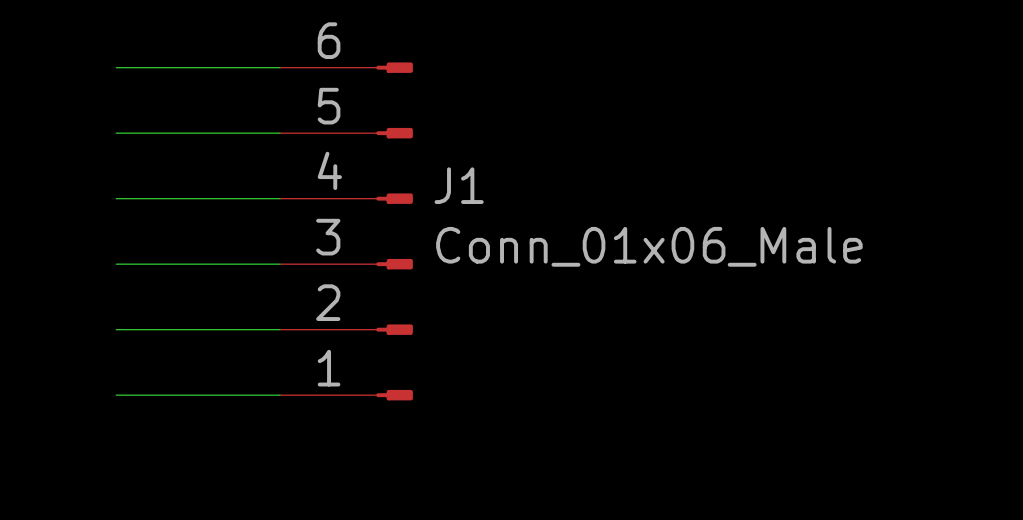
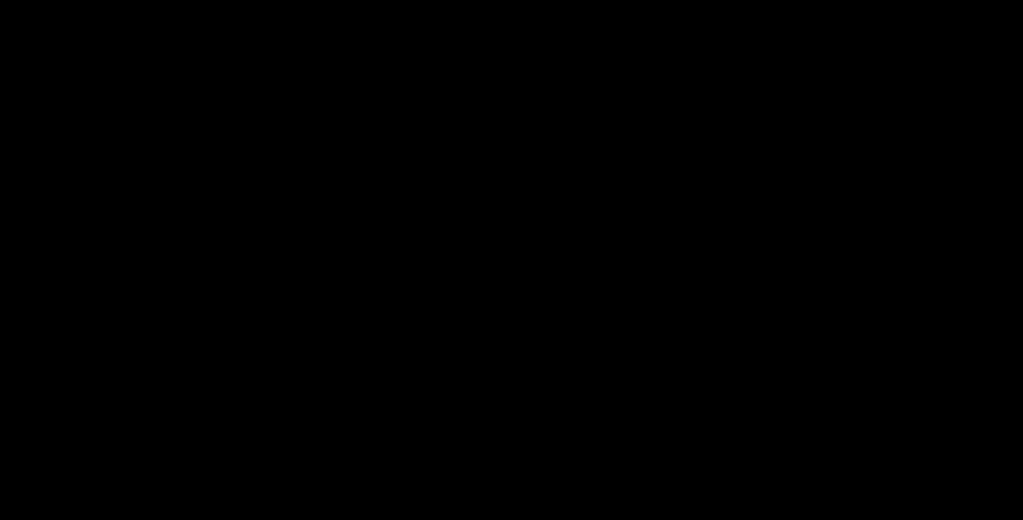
wire: (116, 67) (279, 67) -> none
wire: (116, 133) (279, 133) -> none
wire: (116, 198) (279, 198) -> none
J1: Conn_01x06_Male (346, 231) -> none
wire: (116, 264) (279, 264) -> none
wire: (116, 329) (279, 329) -> none
wire: (116, 395) (279, 395) -> none

